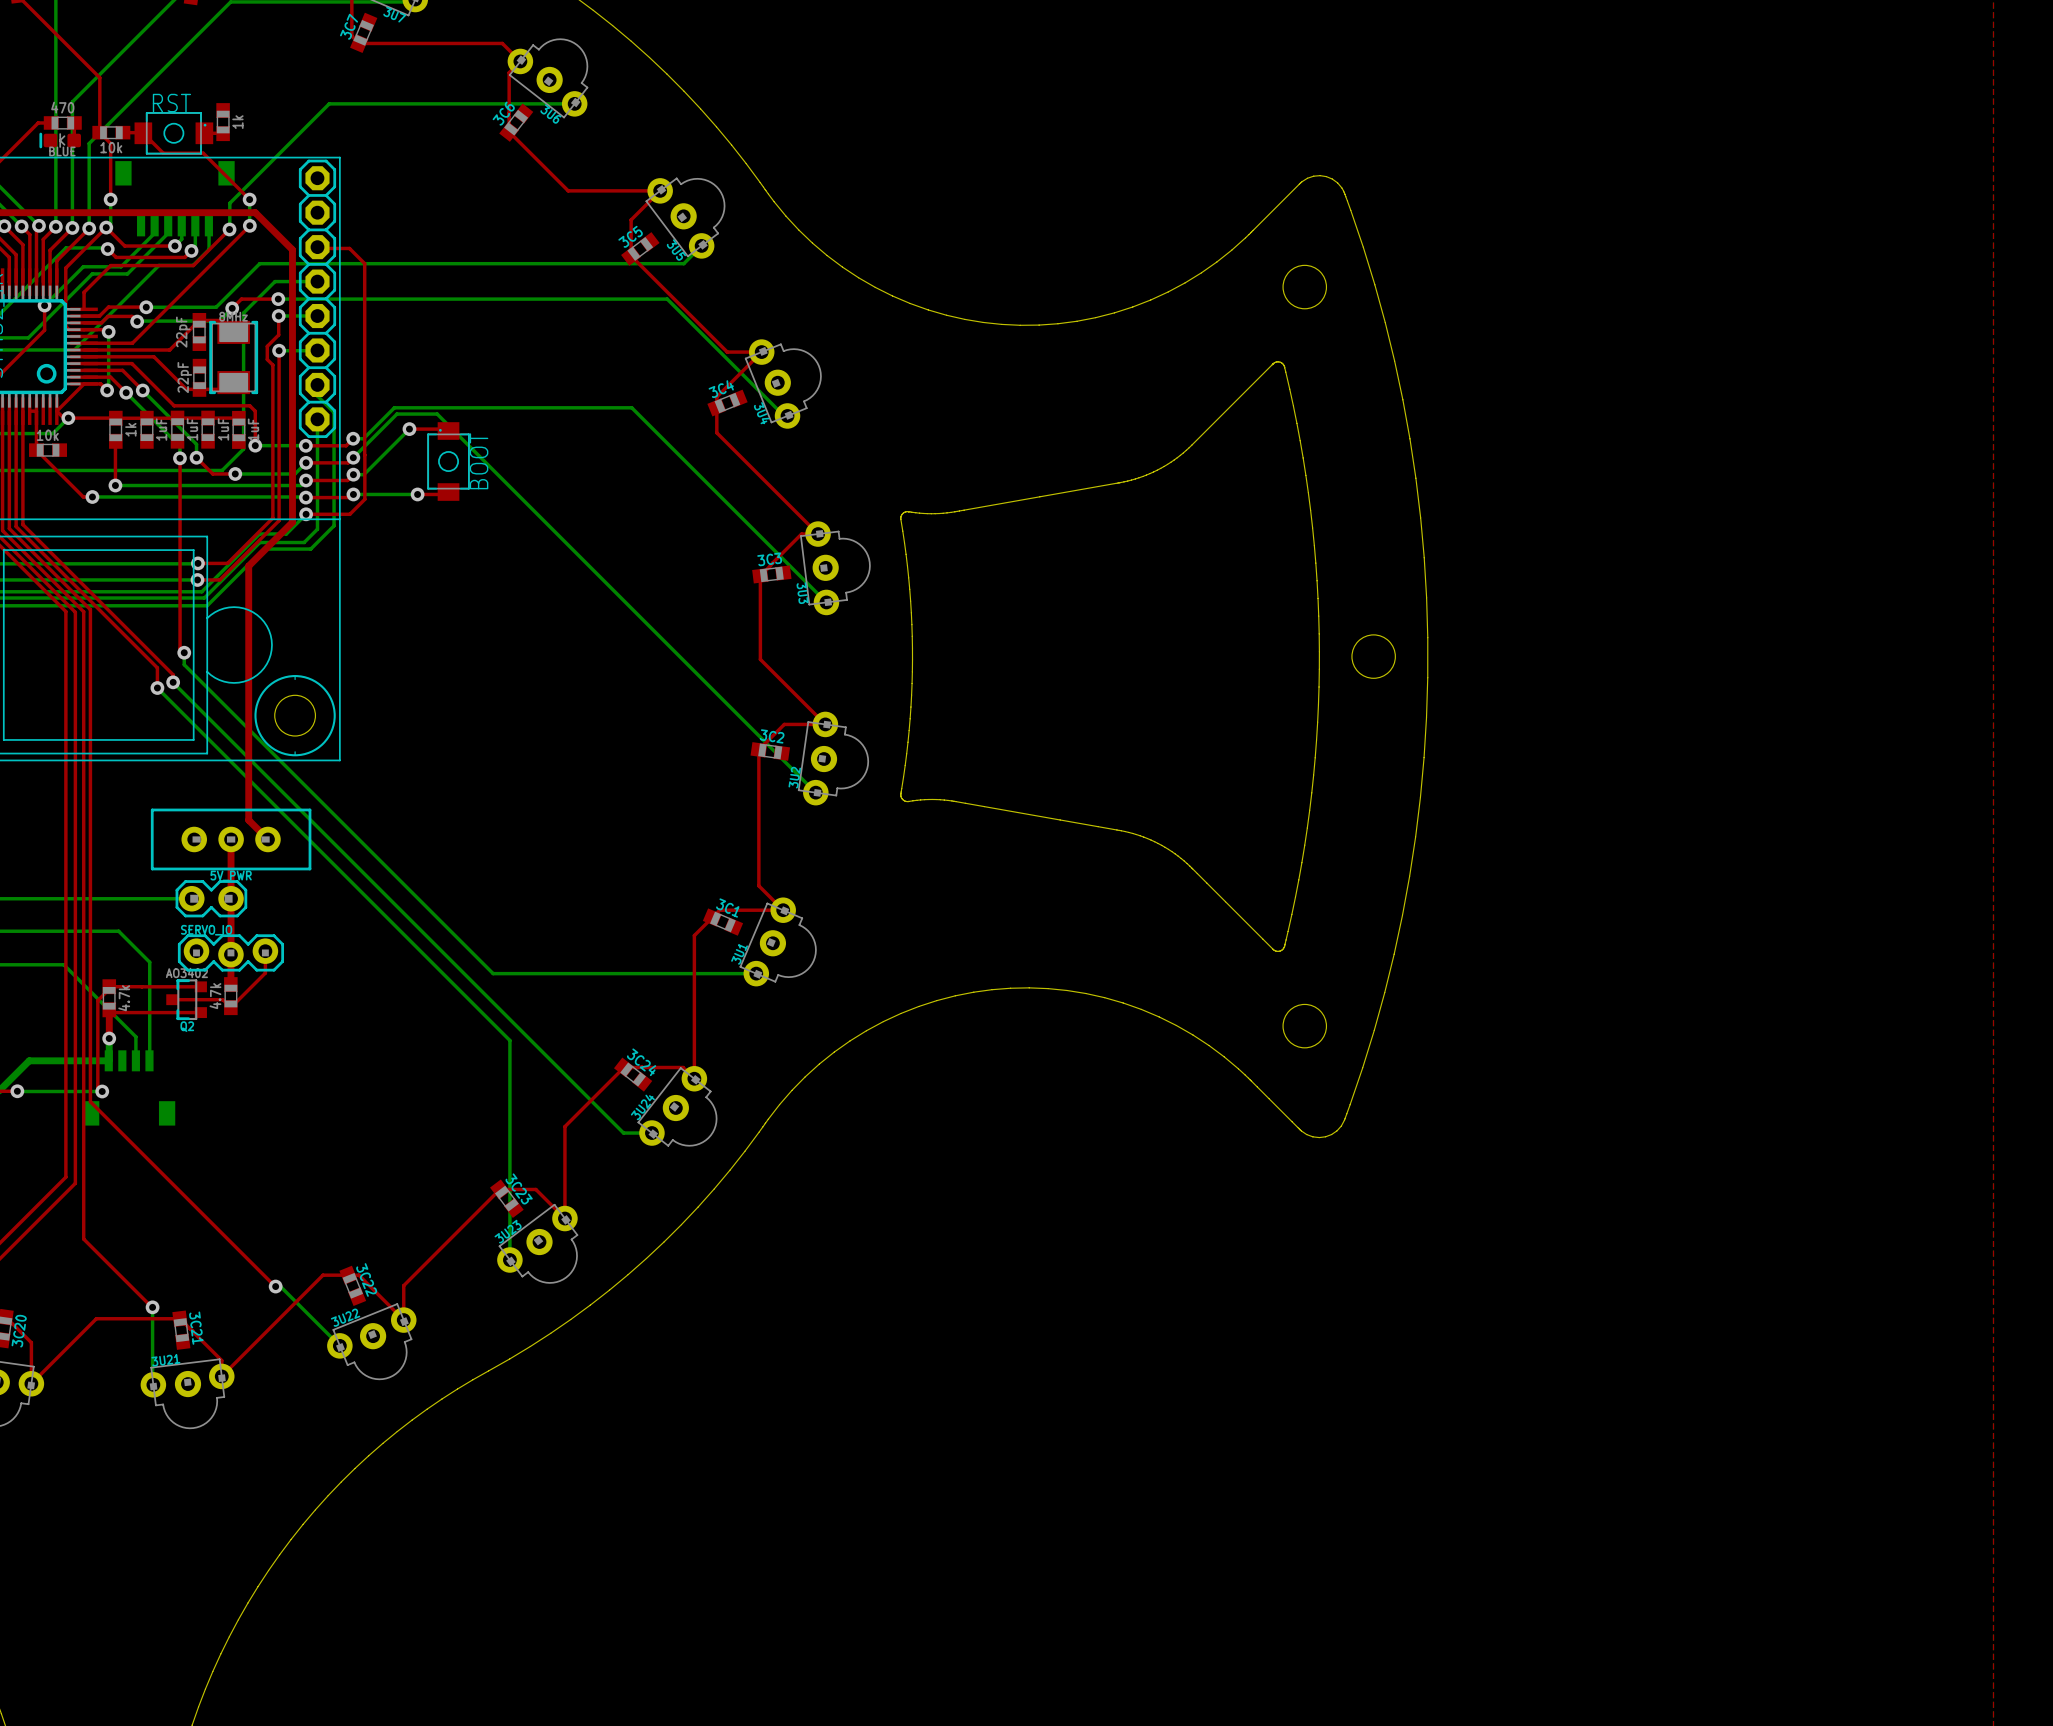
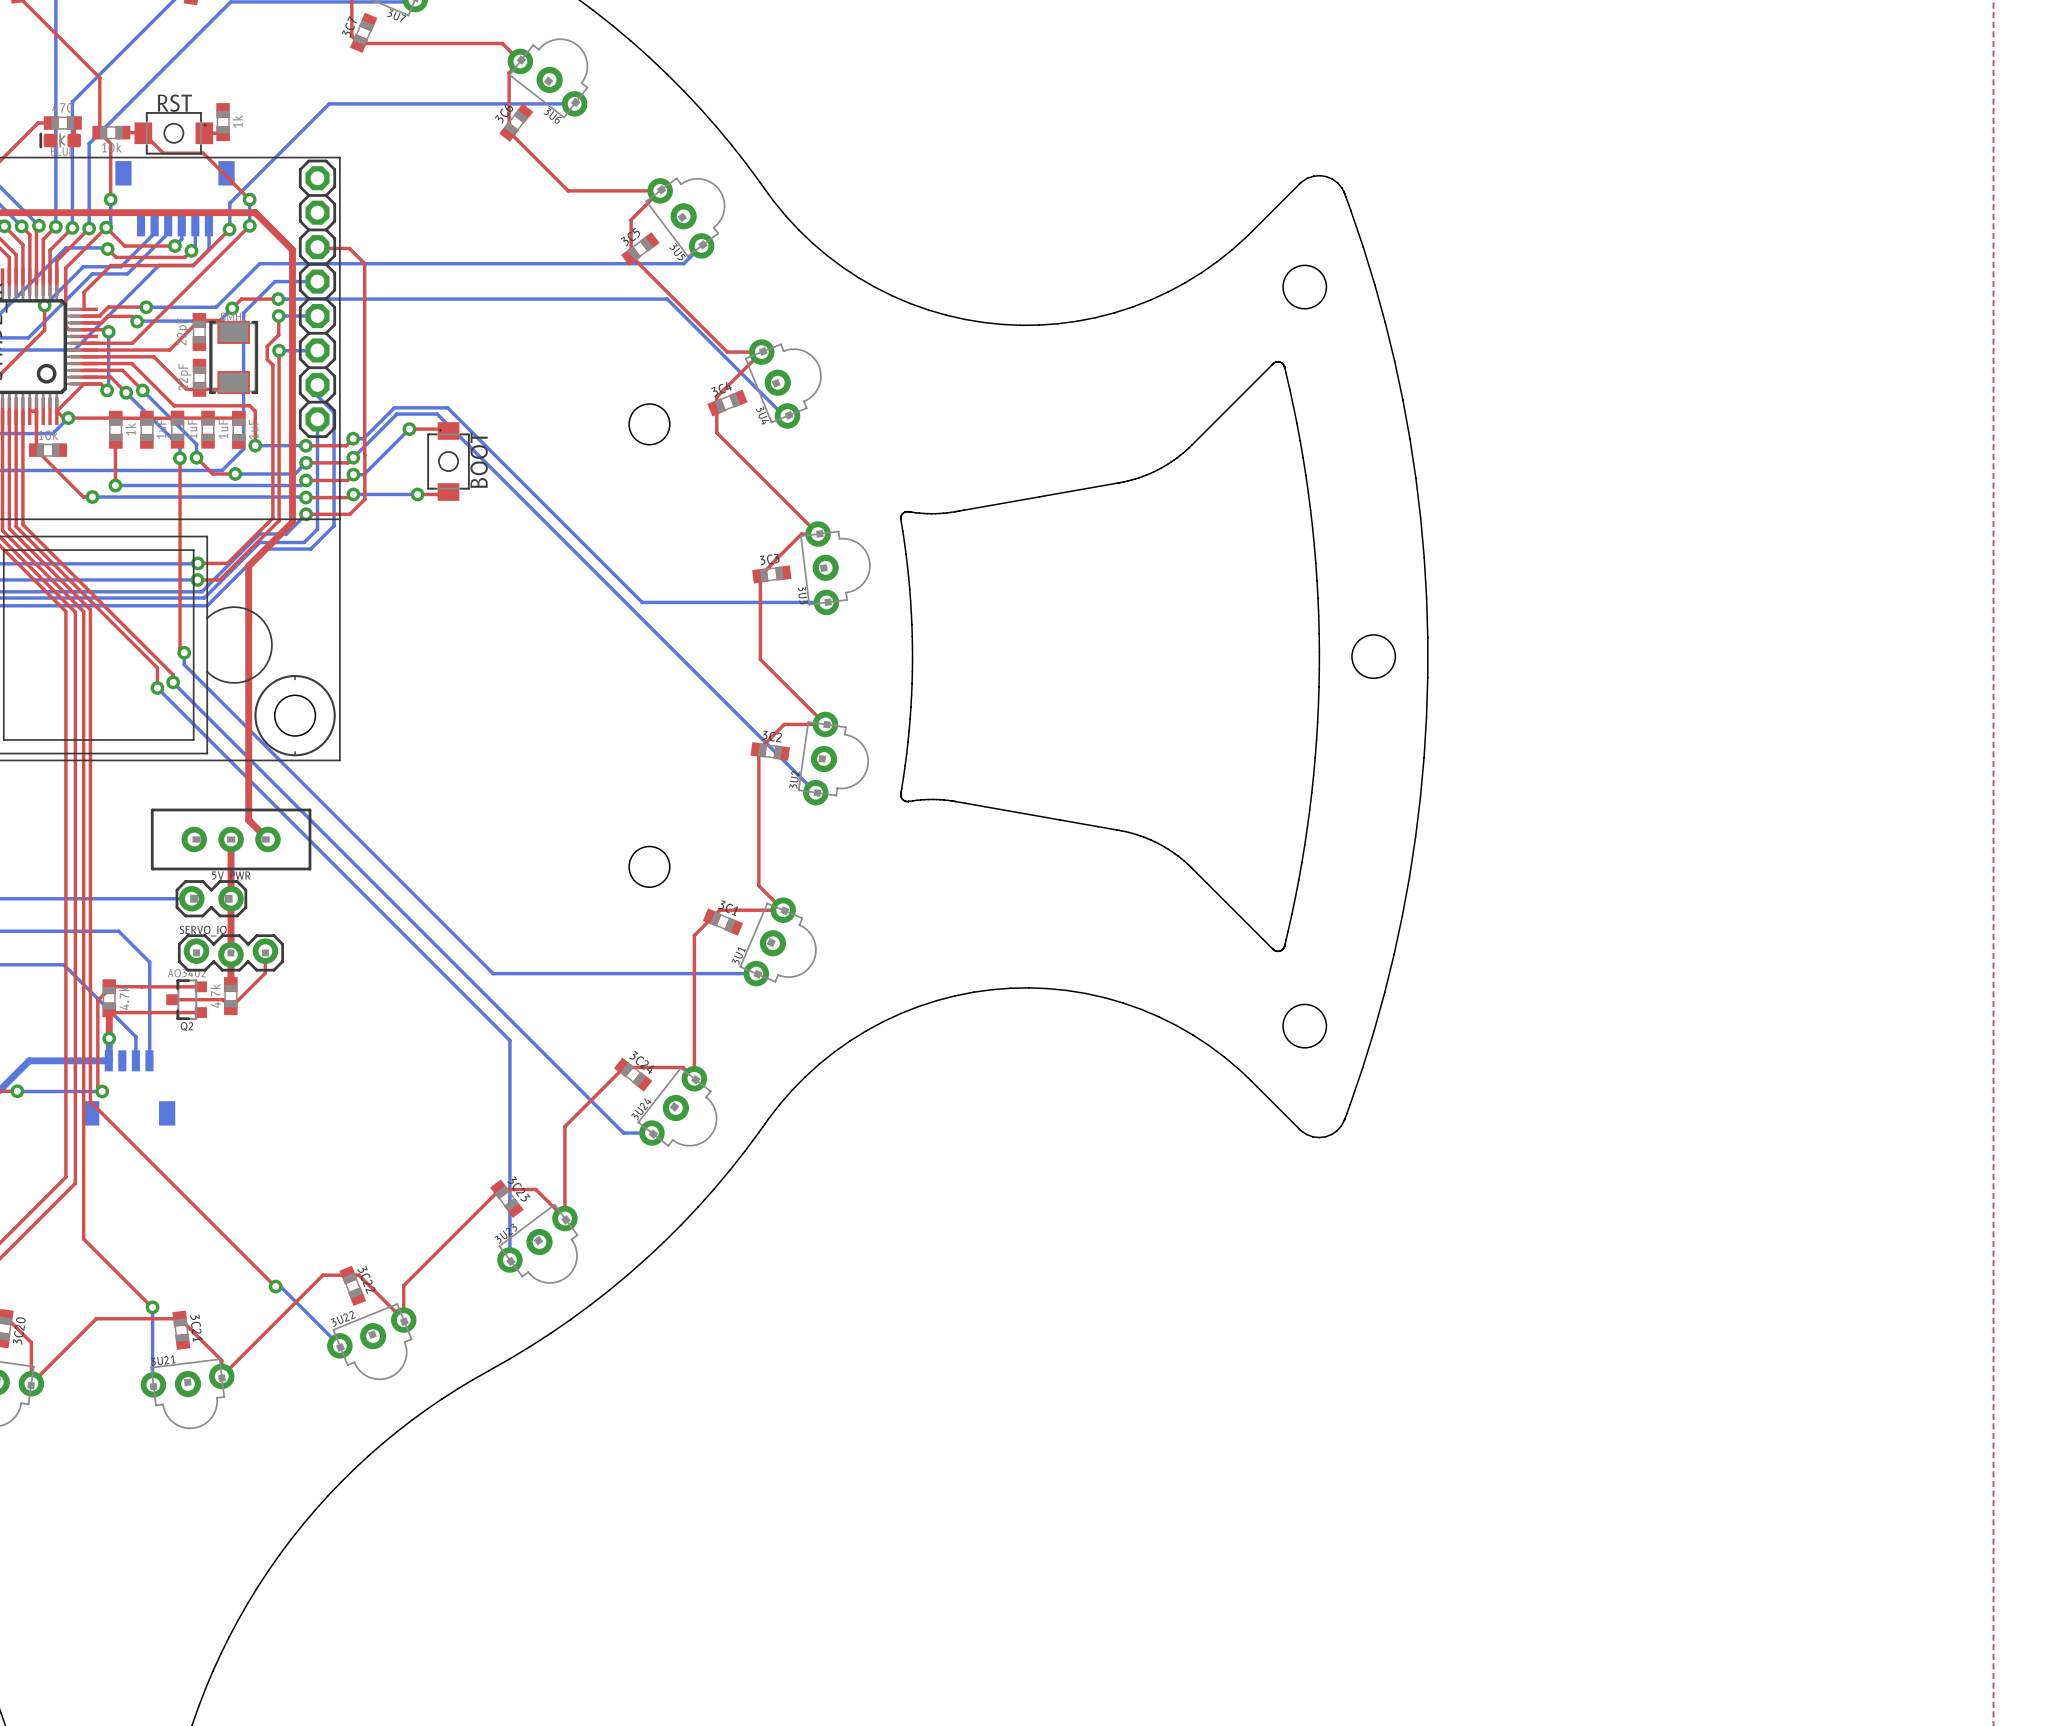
round board edge: none -> [629, 404, 670, 445]
bottom track: (447, 407) (631, 407) (826, 602) -> (447, 407) (642, 602) (826, 602)
round board edge: none -> [629, 846, 670, 888]

